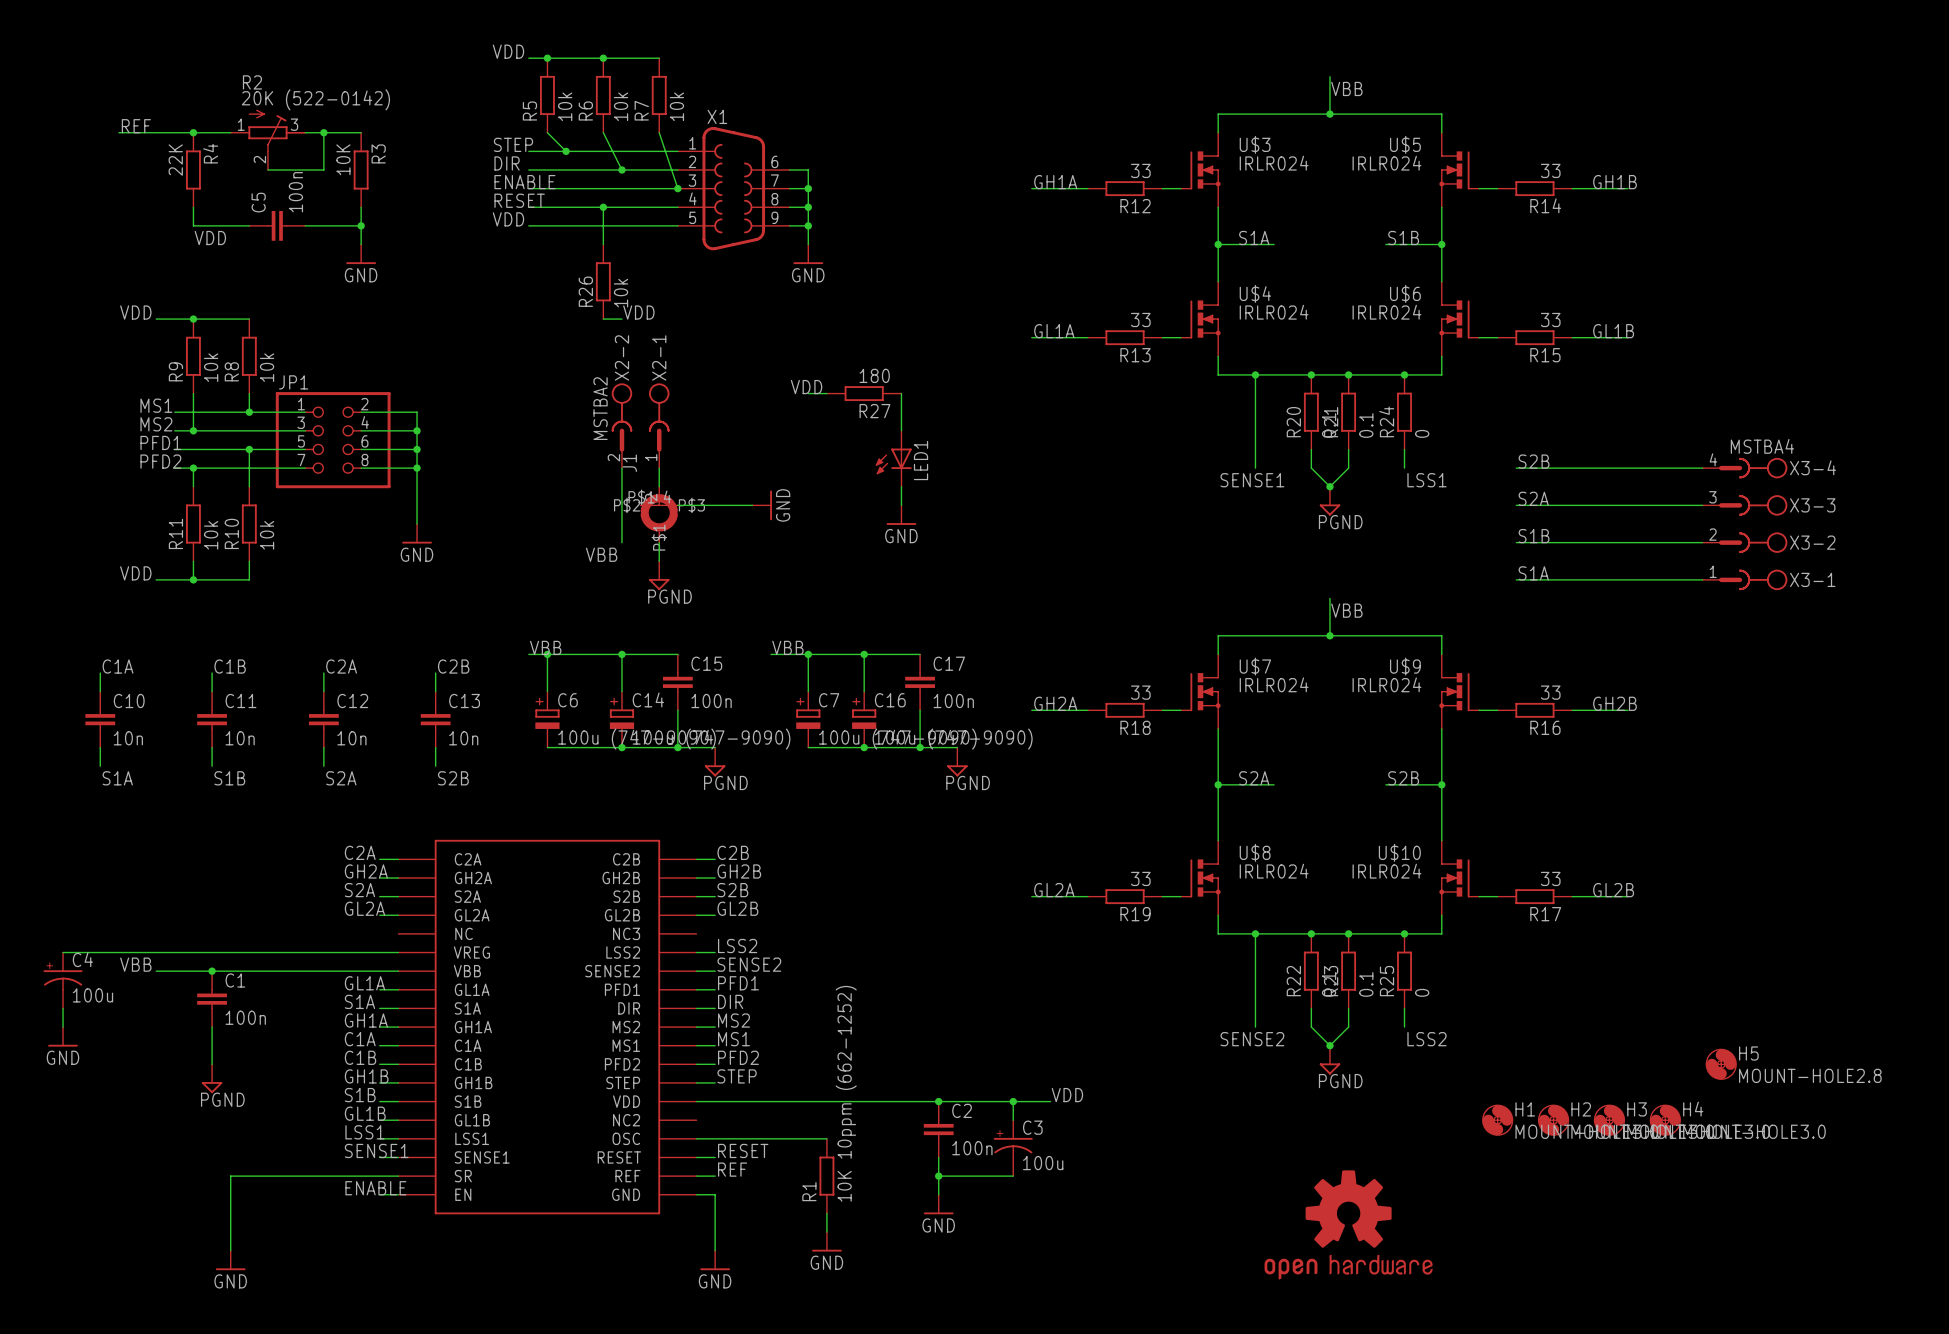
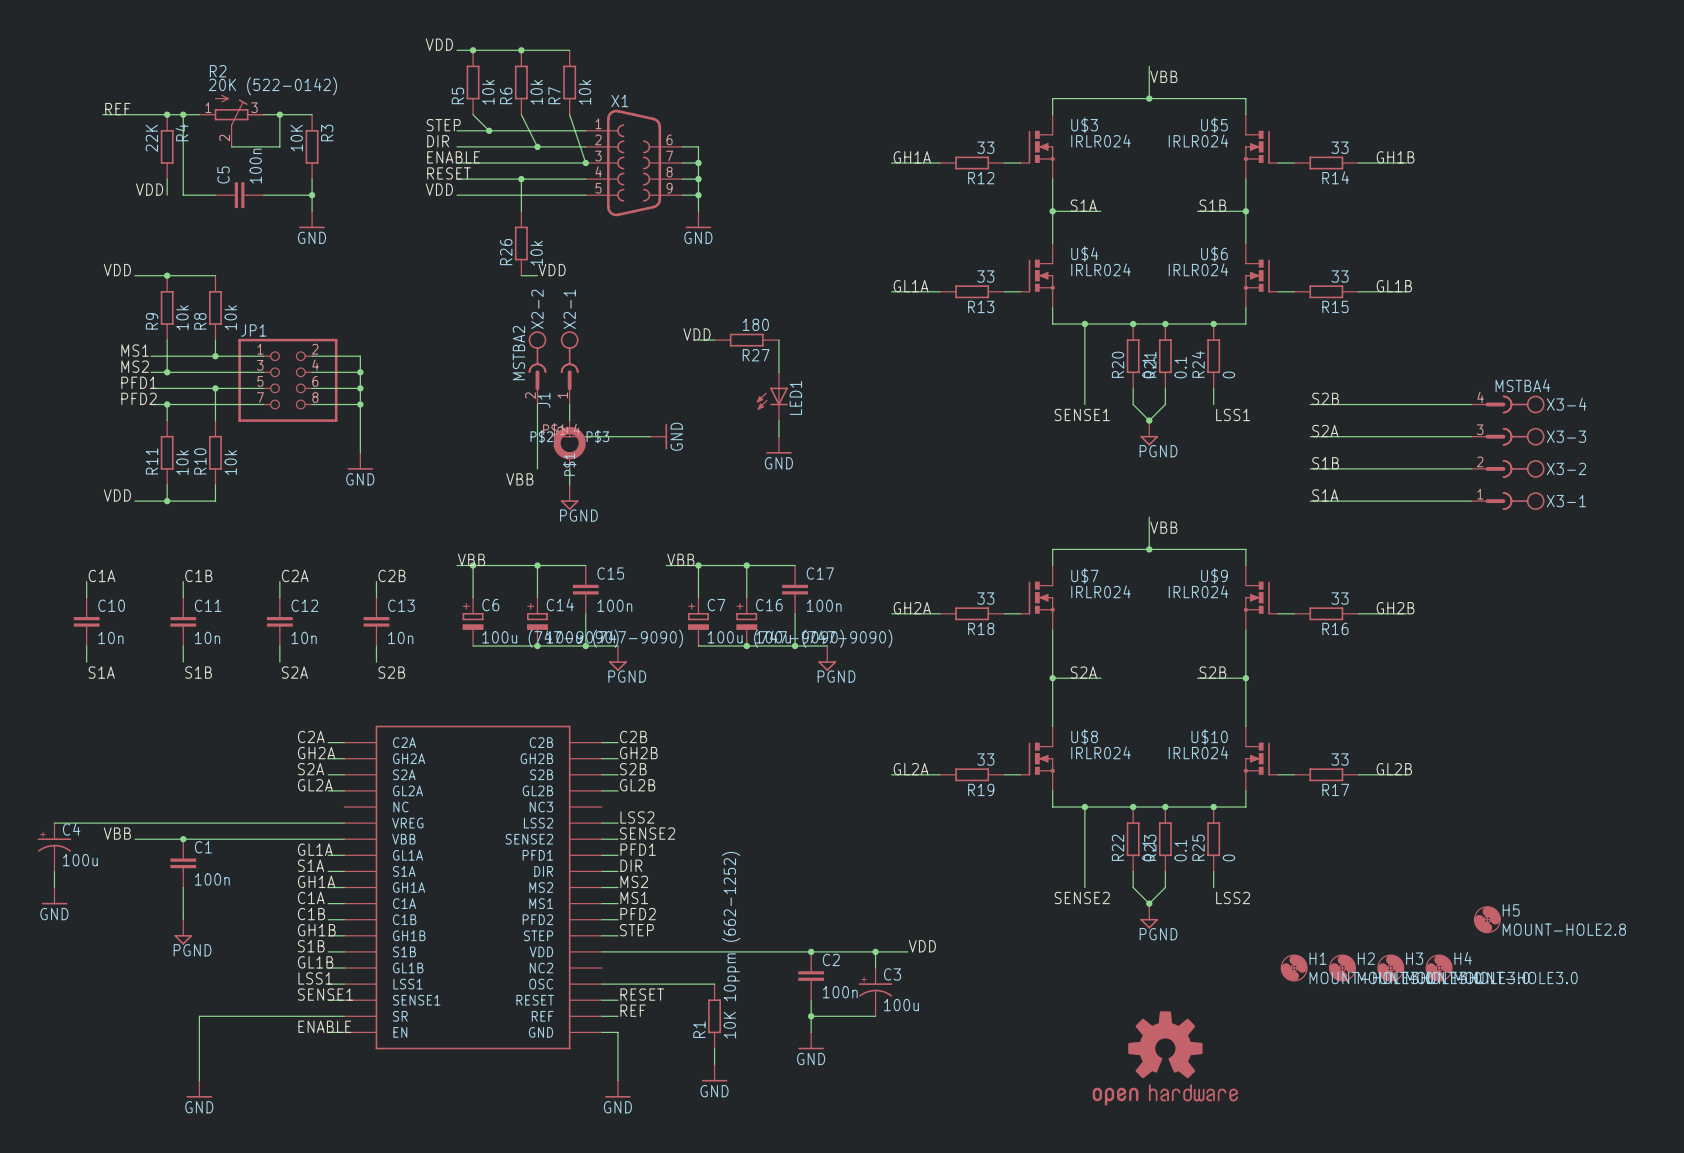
junction: none -> (183, 114)
wire: (193, 225) (212, 225) -> (183, 114) (183, 195)
label position: VDD (210, 238) -> VDD (149, 189)

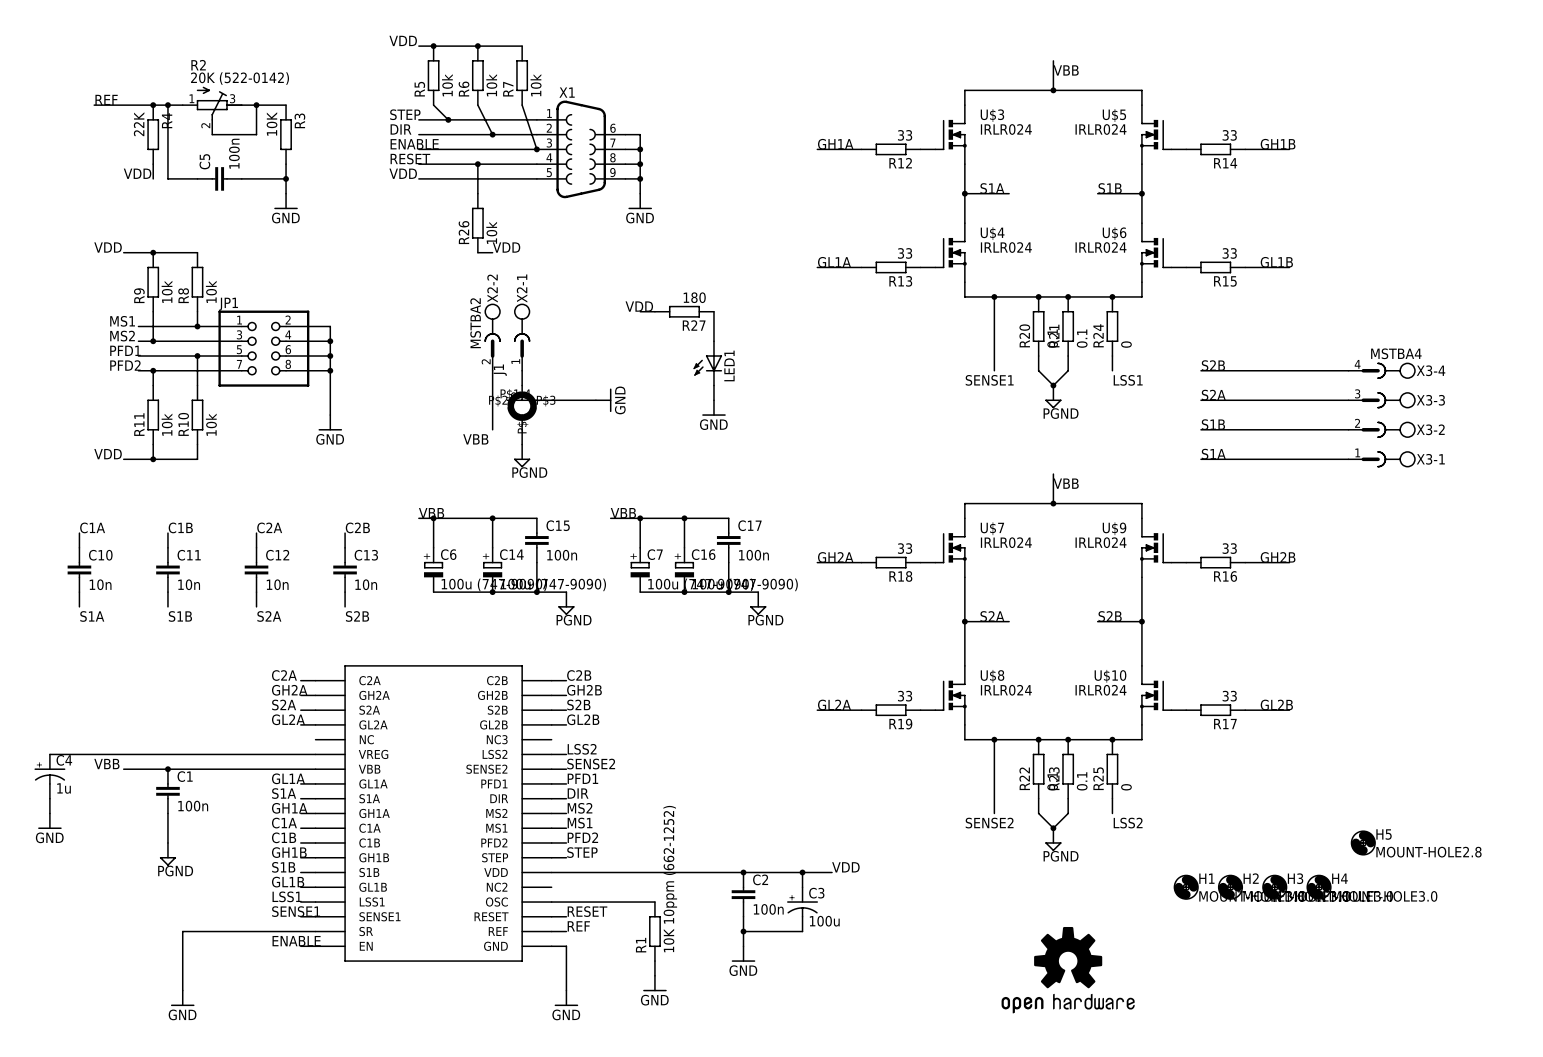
C4 value: 100u (80, 860) -> 1u (64, 788)

